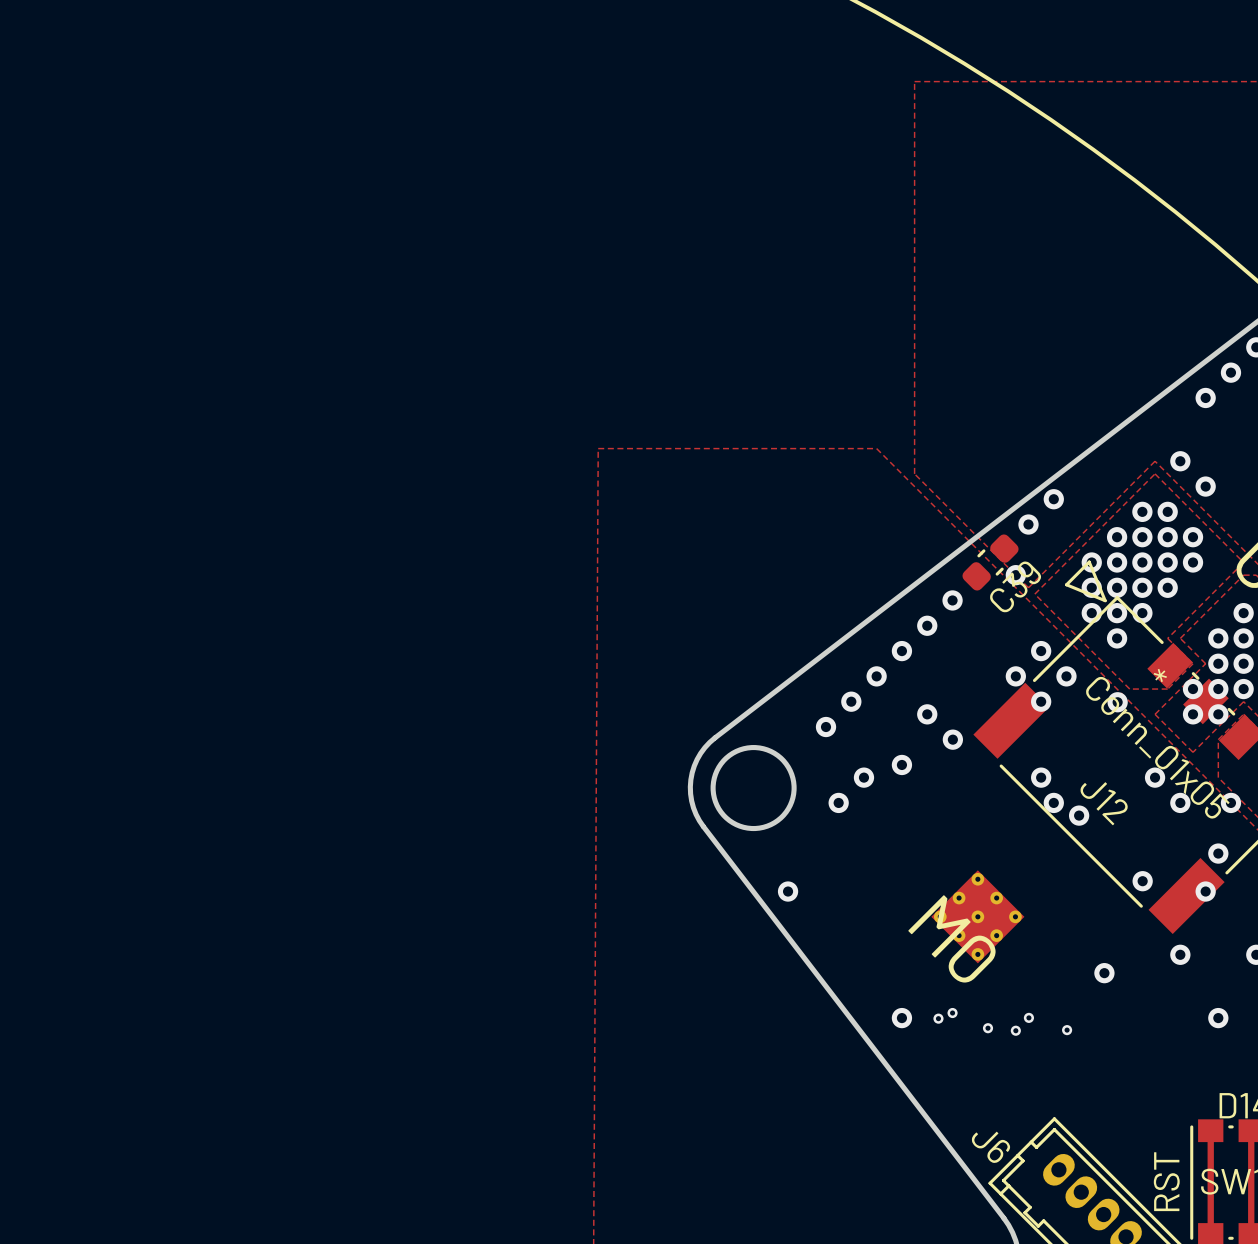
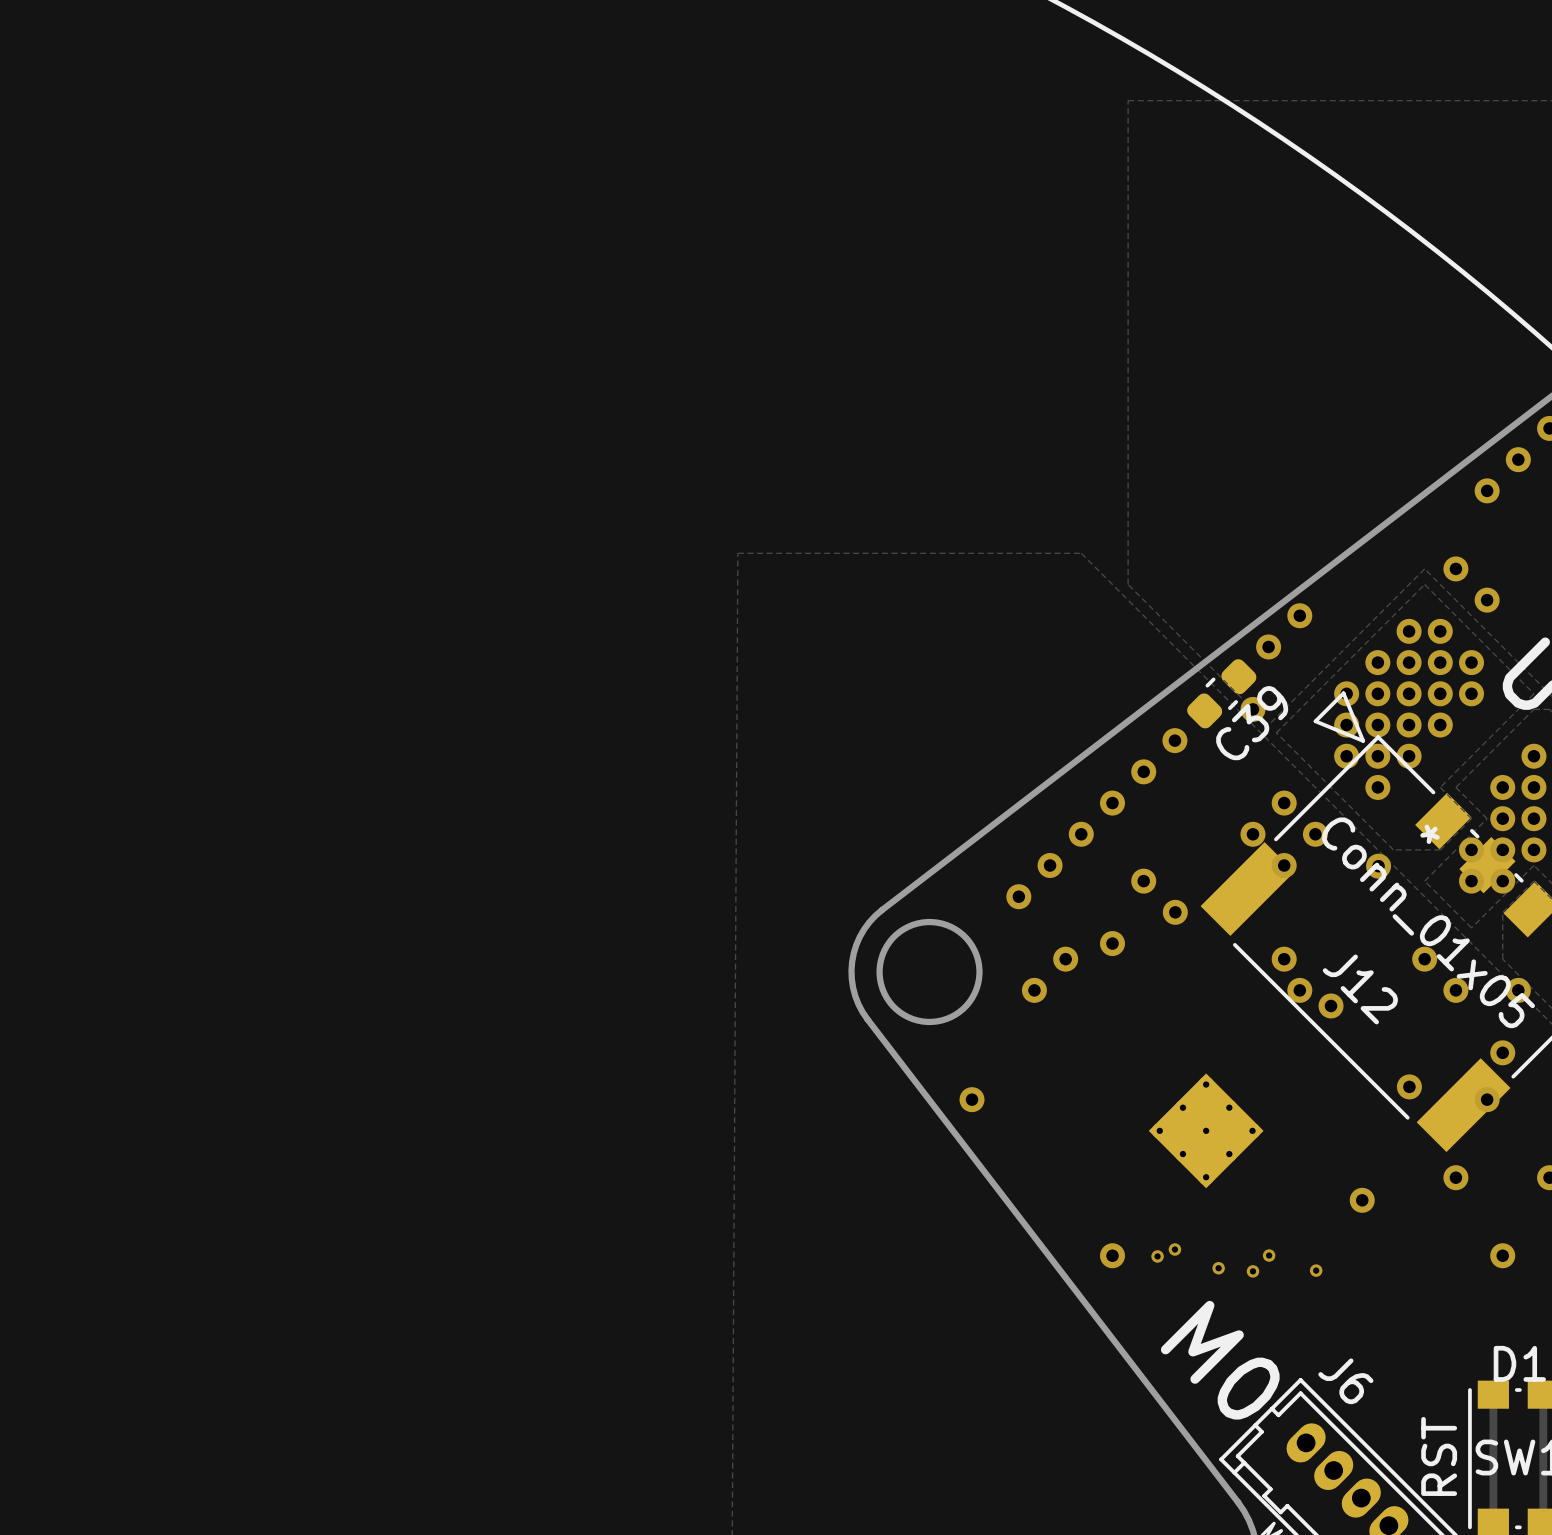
text position: M0 (951, 938) -> M0 (1220, 1360)
J6 name position: J6 (990, 1147) -> J6 (1345, 1381)

